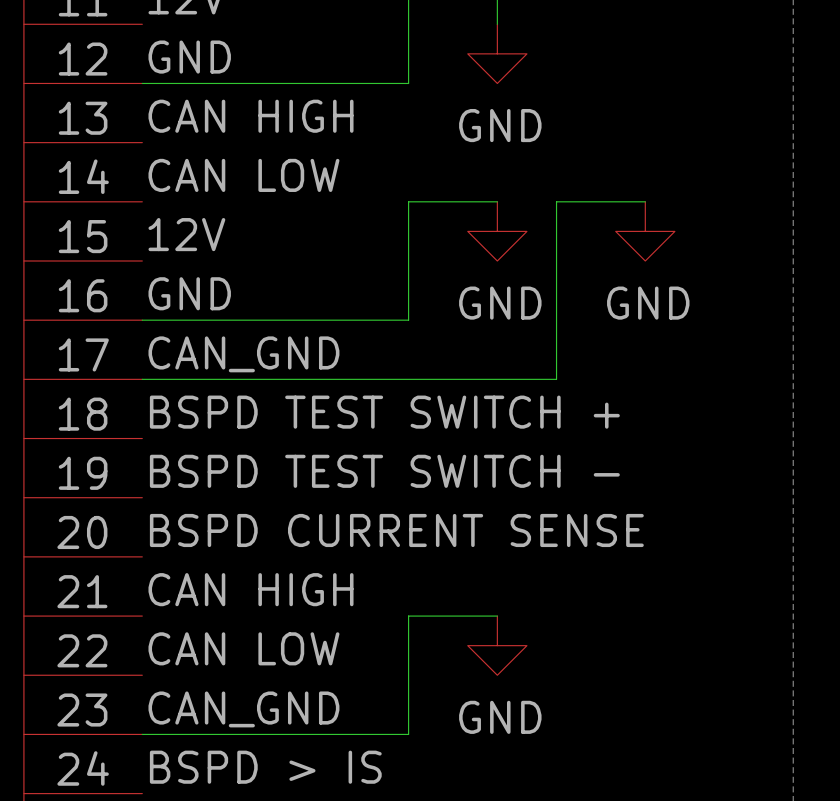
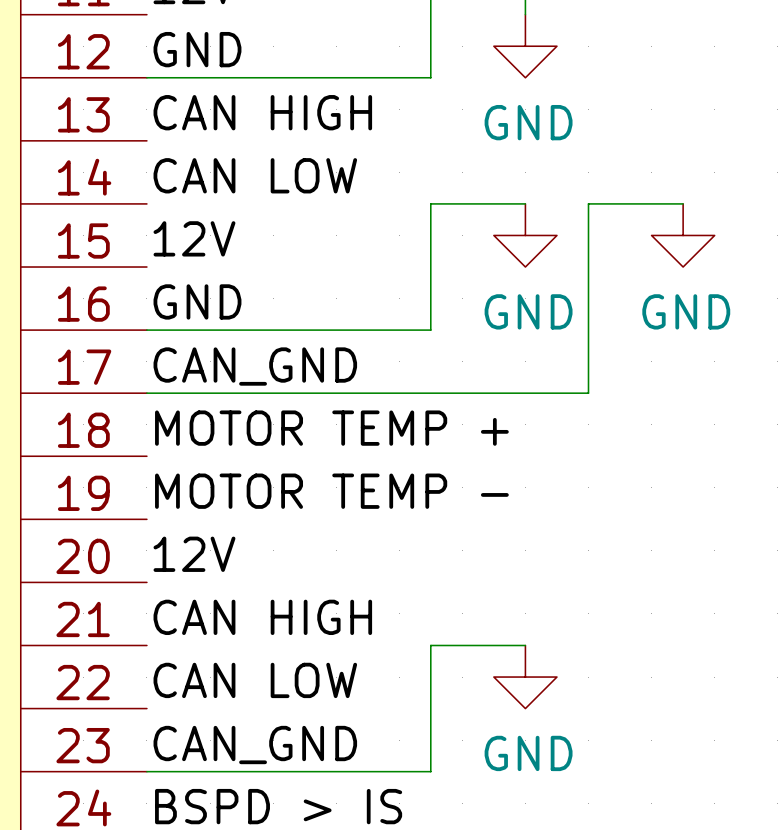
label: BSPD TEST SWITCH + (384, 412) -> MOTOR TEMP + (331, 428)
label: BSPD TEST SWITCH - (384, 471) -> MOTOR TEMP - (331, 491)
label: BSPD CURRENT SENSE (396, 530) -> 12V (194, 554)

